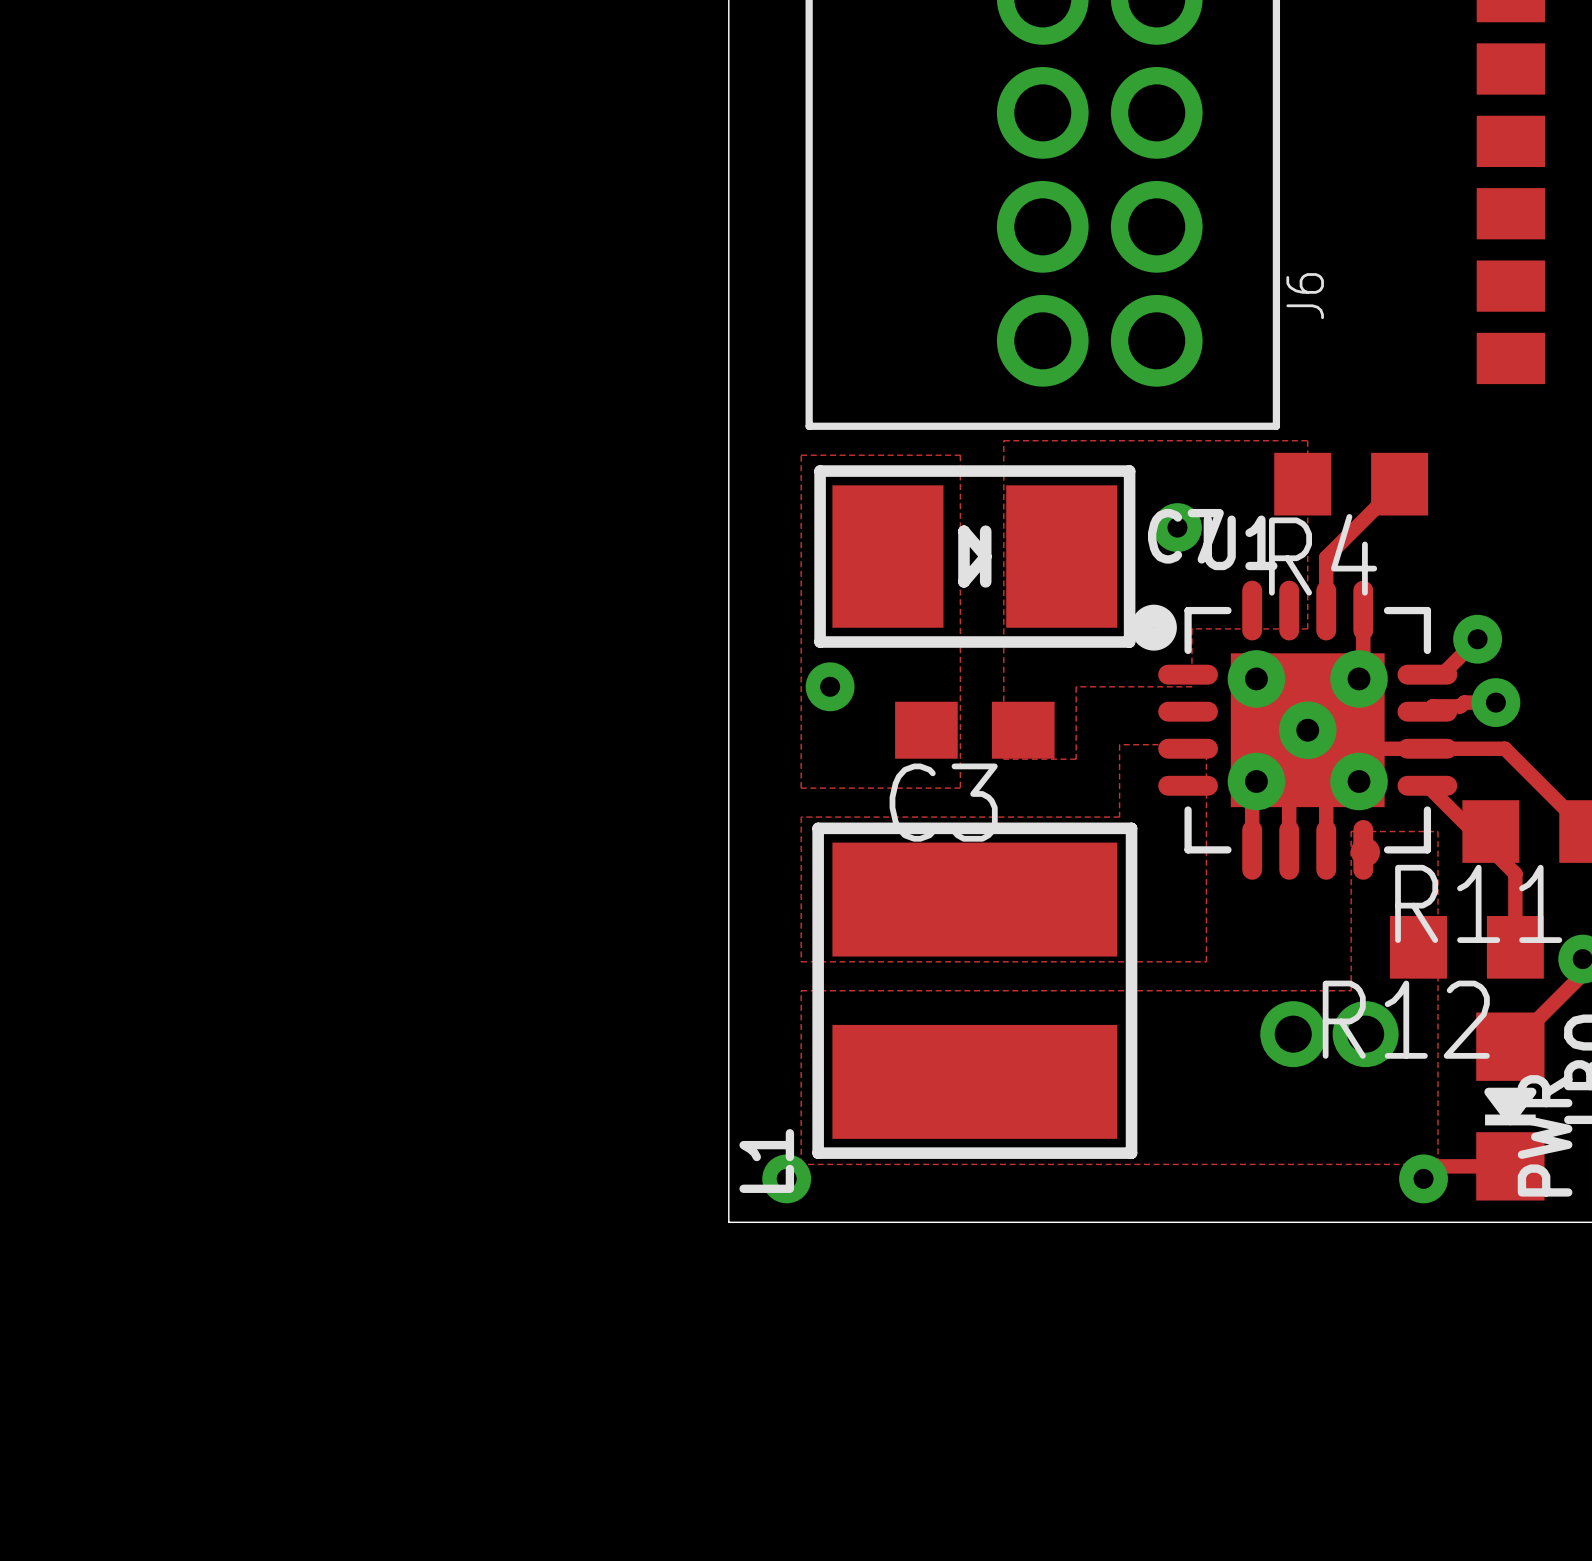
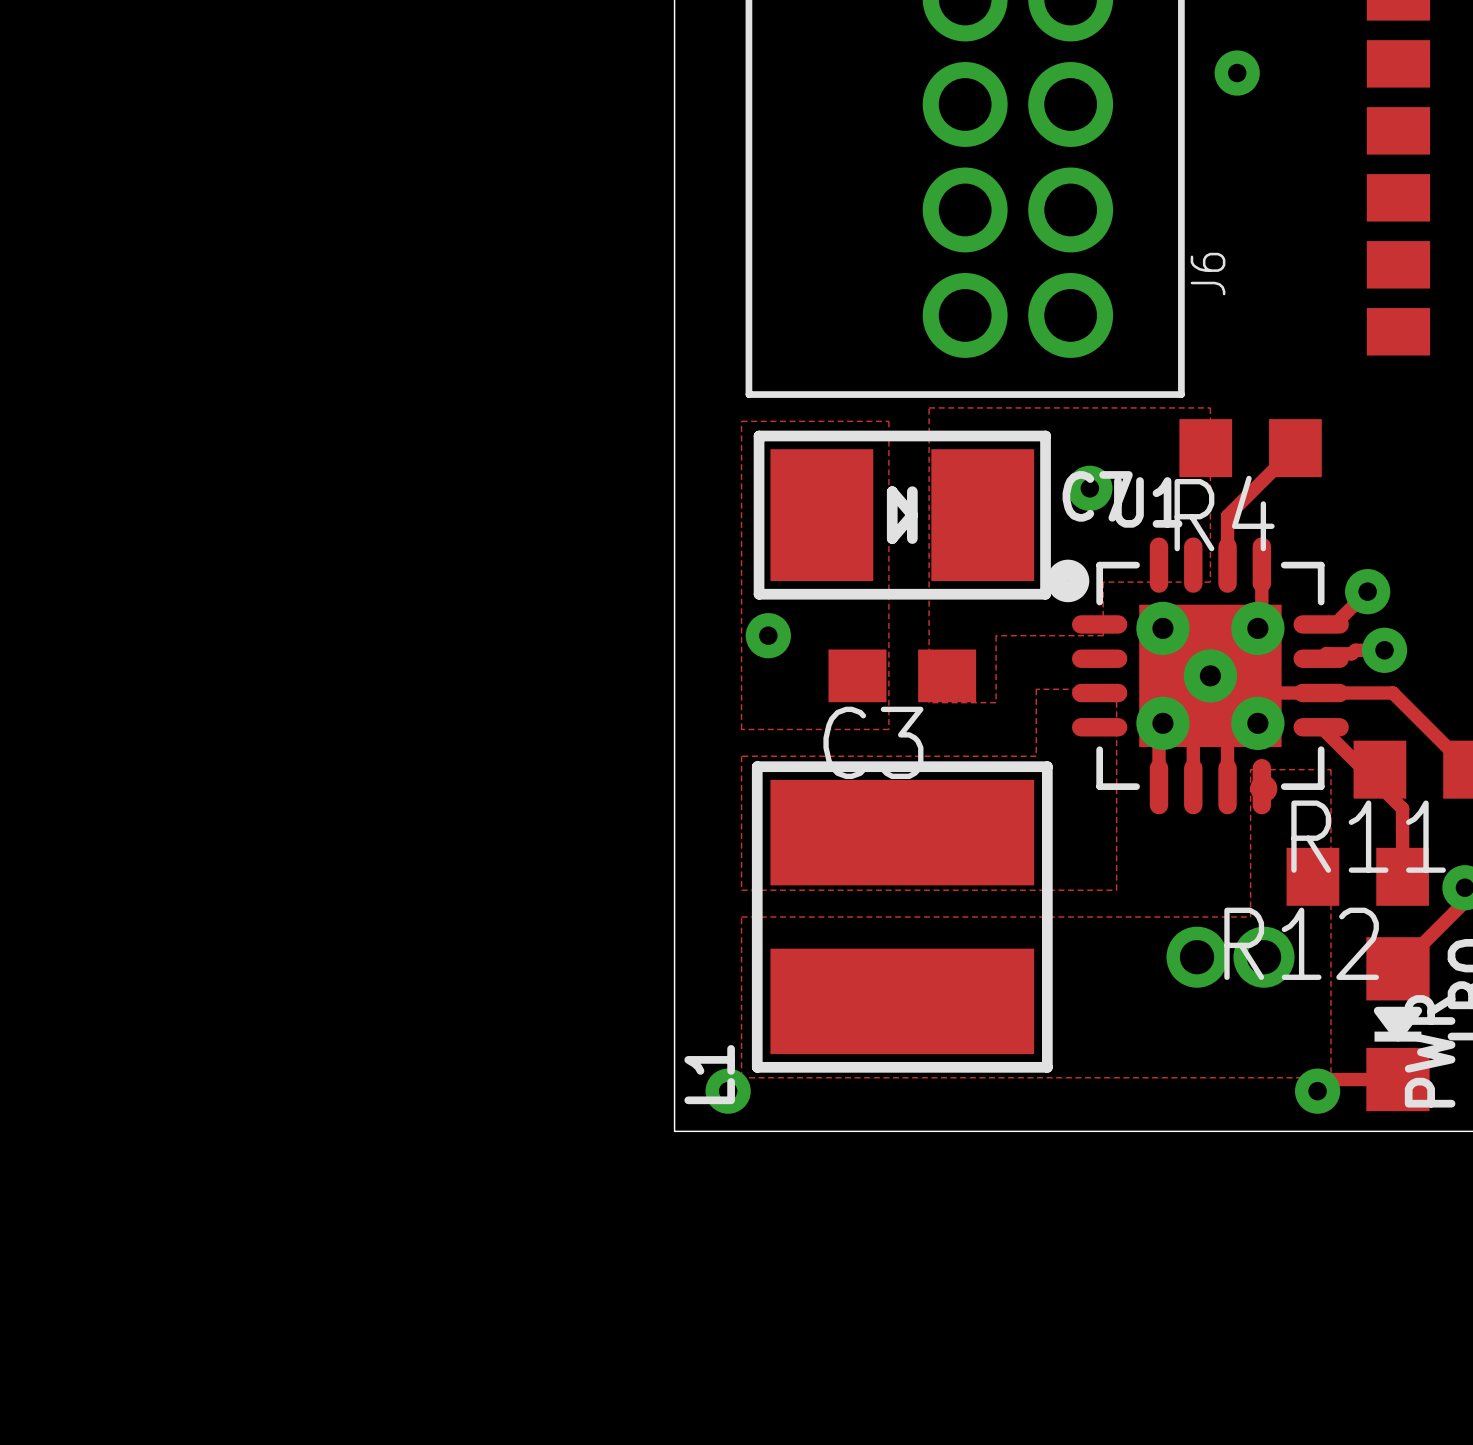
via: none -> (1237, 73)

